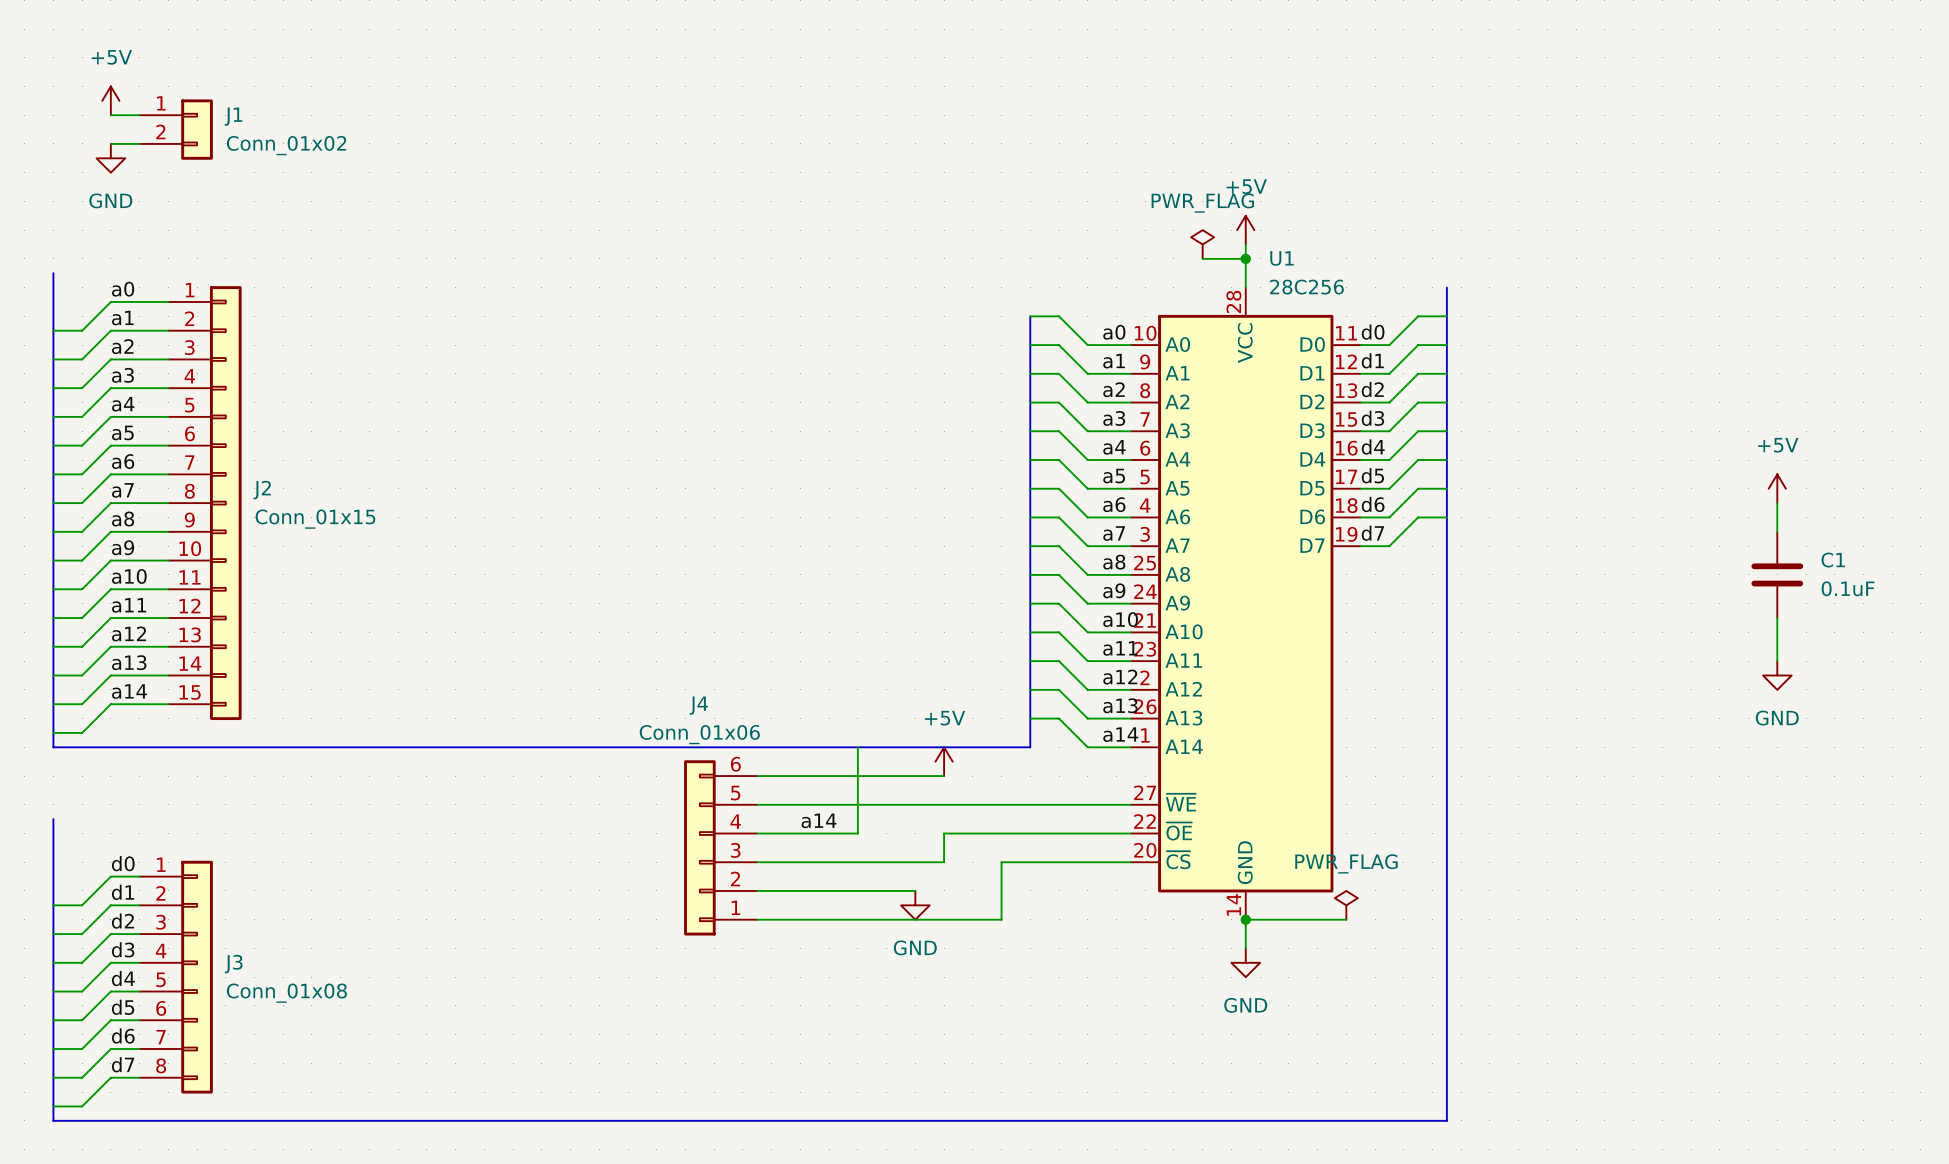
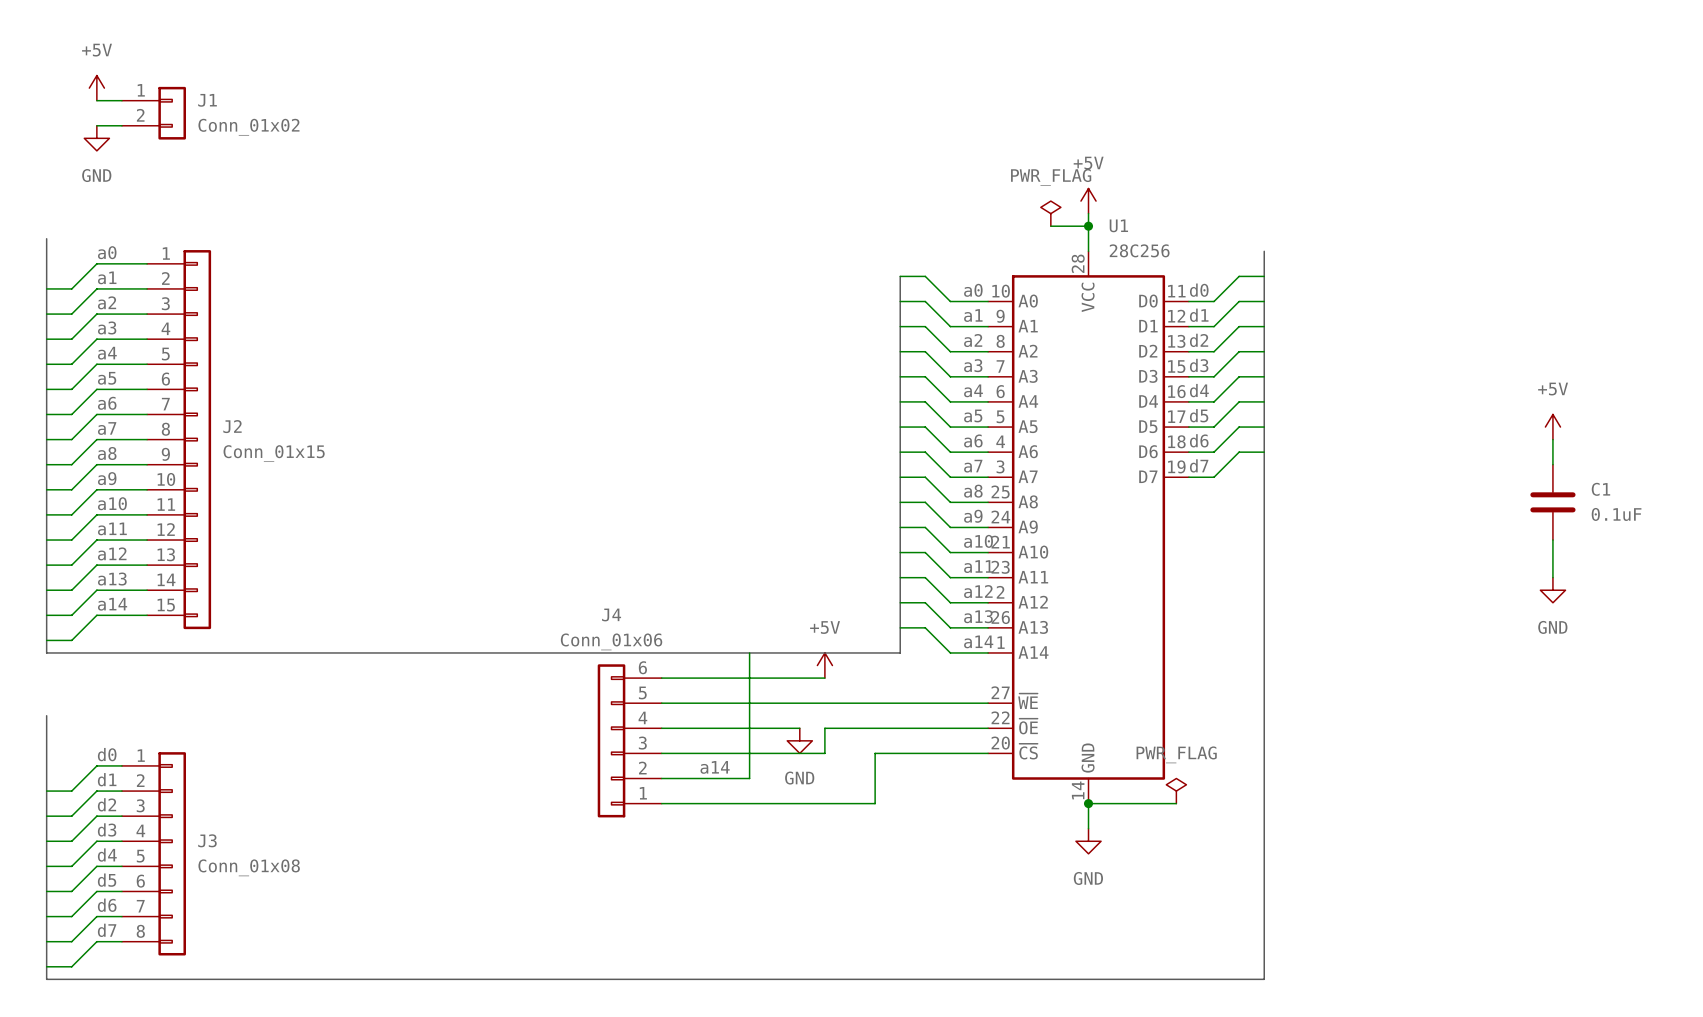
label position: a14 (819, 820) -> a14 (715, 767)
wire: (857, 890) (915, 890) -> (749, 778) (749, 728) (799, 728)
power symbol position: GND (915, 905) -> GND (799, 740)

